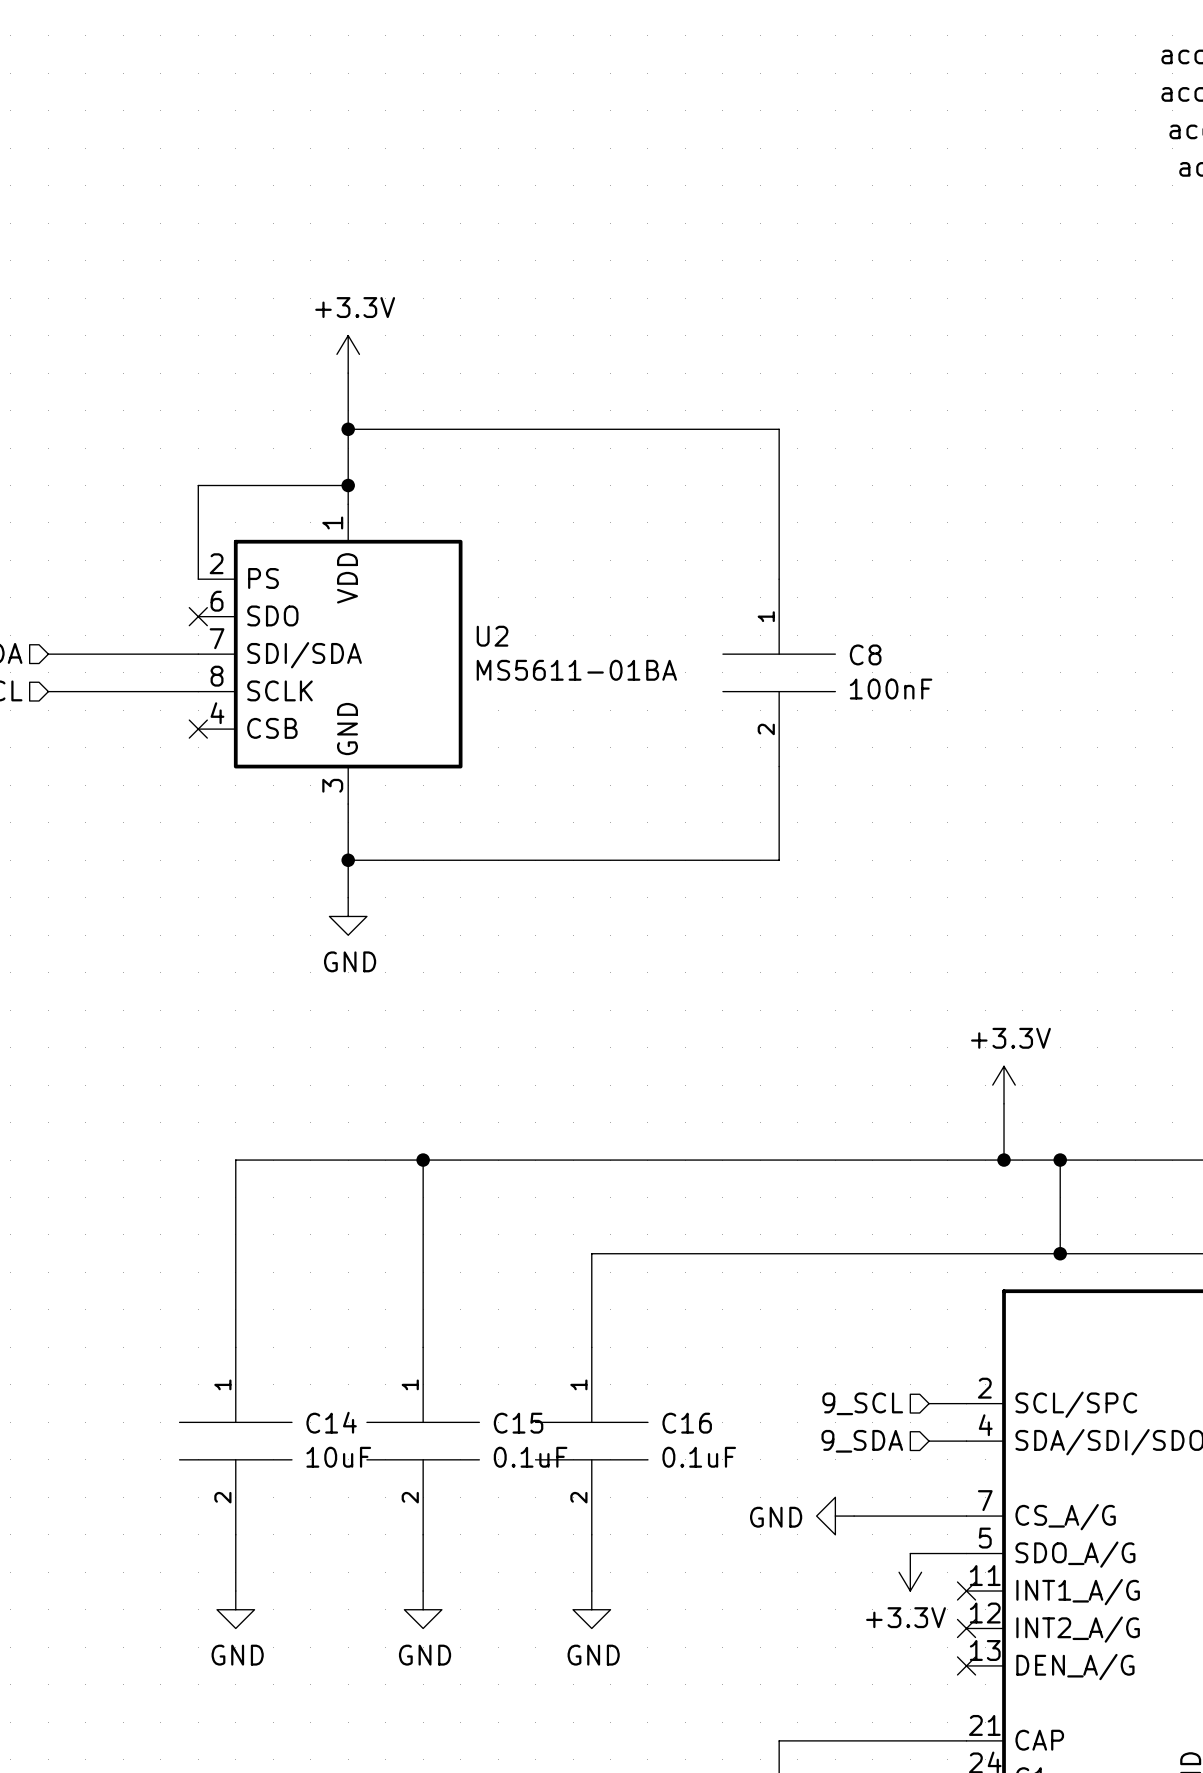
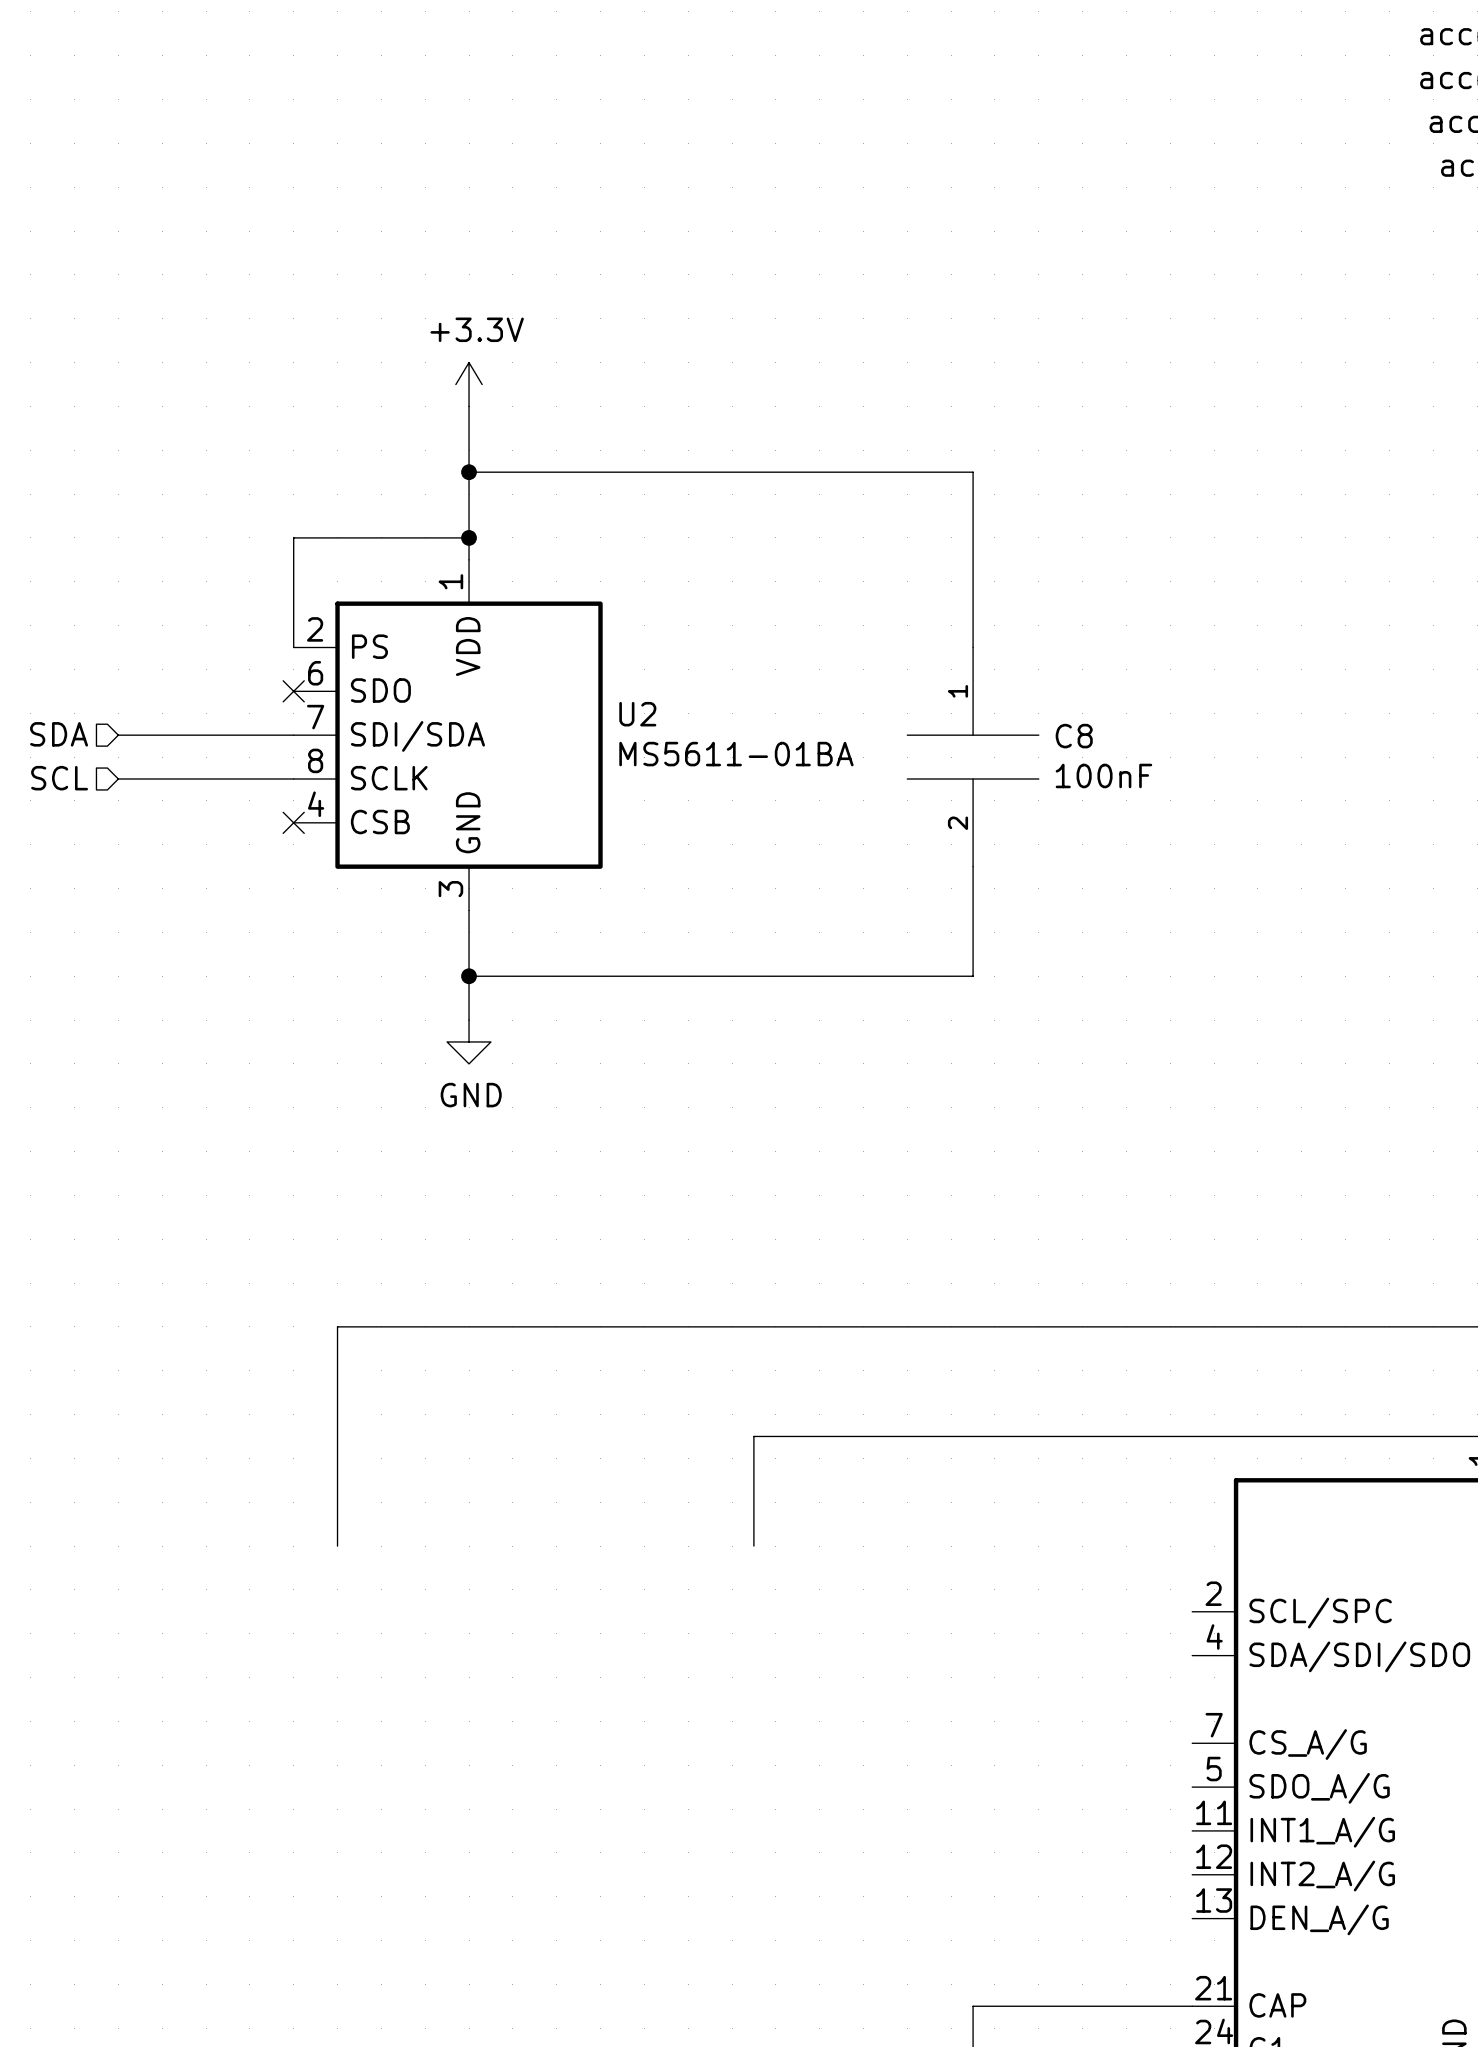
power symbol: +3.3V (1004, 1085) -> none
wire: (1004, 1103) (1004, 1160) -> none
wire: (423, 1160) (423, 1347) -> none
junction: (423, 1160) -> none
junction: (1004, 1160) -> none
wire: (1060, 1160) (1060, 1253) -> none
junction: (1060, 1160) -> none
junction: (1060, 1253) -> none
hierarchical label: 9_SCL (862, 1403) -> none
wire: (929, 1403) (966, 1403) -> none
C14: 10uF (235, 1441) -> none
C15: 0.1uF (423, 1441) -> none
C16: 0.1uF (591, 1441) -> none
hierarchical label: 9_SDA (862, 1441) -> none
wire: (929, 1441) (966, 1441) -> none
power symbol: GND (835, 1516) -> none
wire: (854, 1516) (966, 1516) -> none
wire: (235, 1534) (235, 1591) -> none
wire: (423, 1534) (423, 1591) -> none
wire: (591, 1534) (591, 1591) -> none
wire: (910, 1553) (966, 1553) -> none
power symbol: +3.3V (910, 1572) -> none
no-connect mark: (966, 1591) -> none
power symbol: GND (235, 1609) -> none
power symbol: GND (423, 1609) -> none
power symbol: GND (591, 1609) -> none
no-connect mark: (966, 1628) -> none
no-connect mark: (966, 1665) -> none

